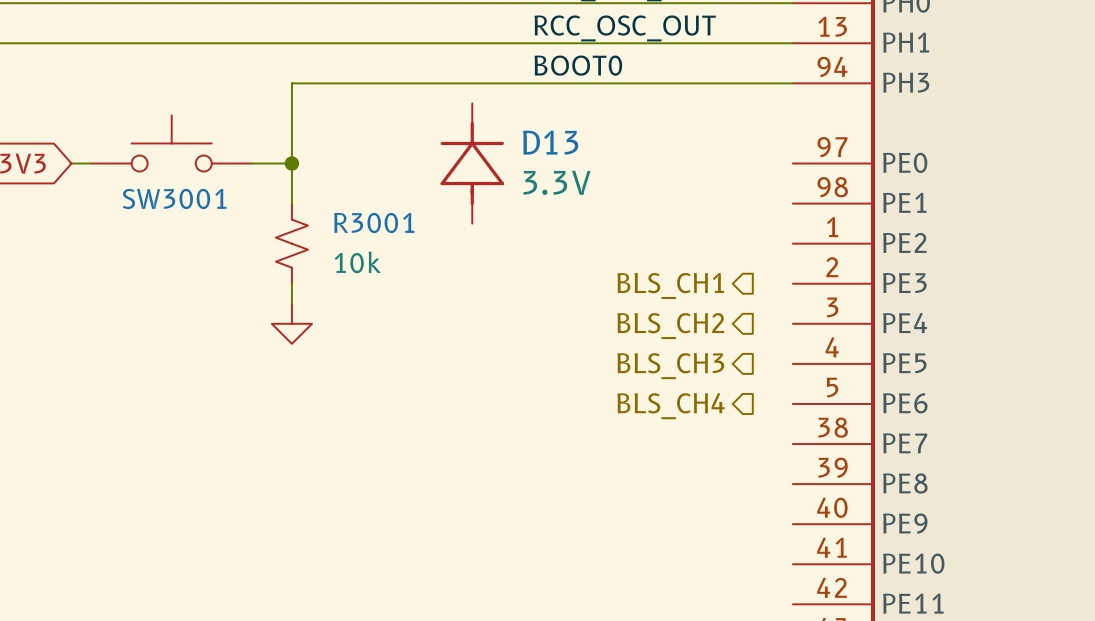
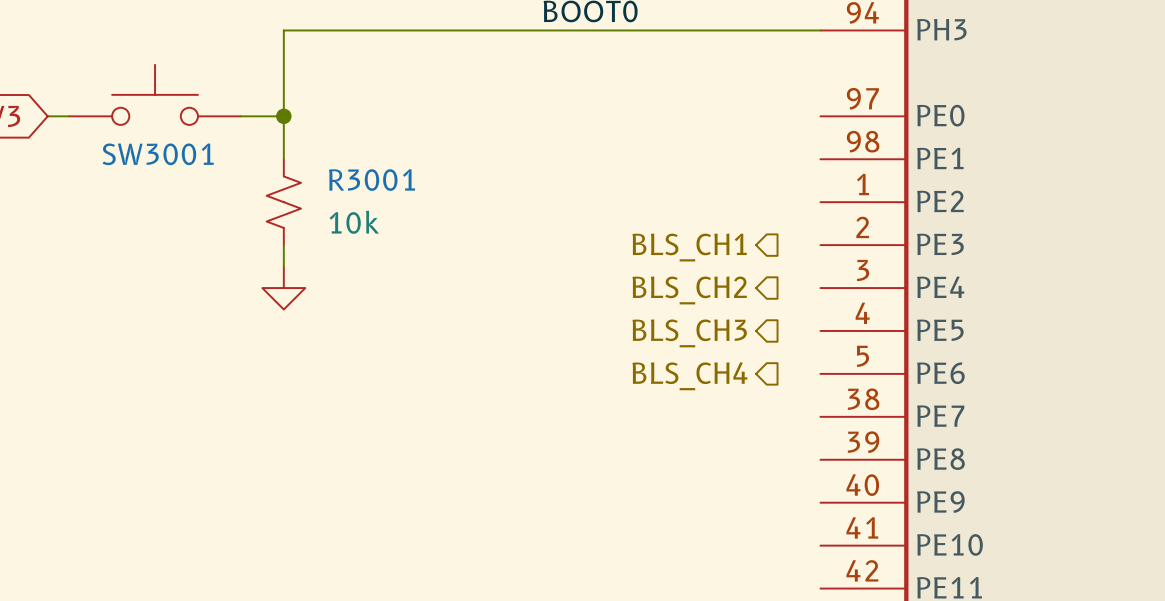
D13: 3.3V (472, 163) -> none

